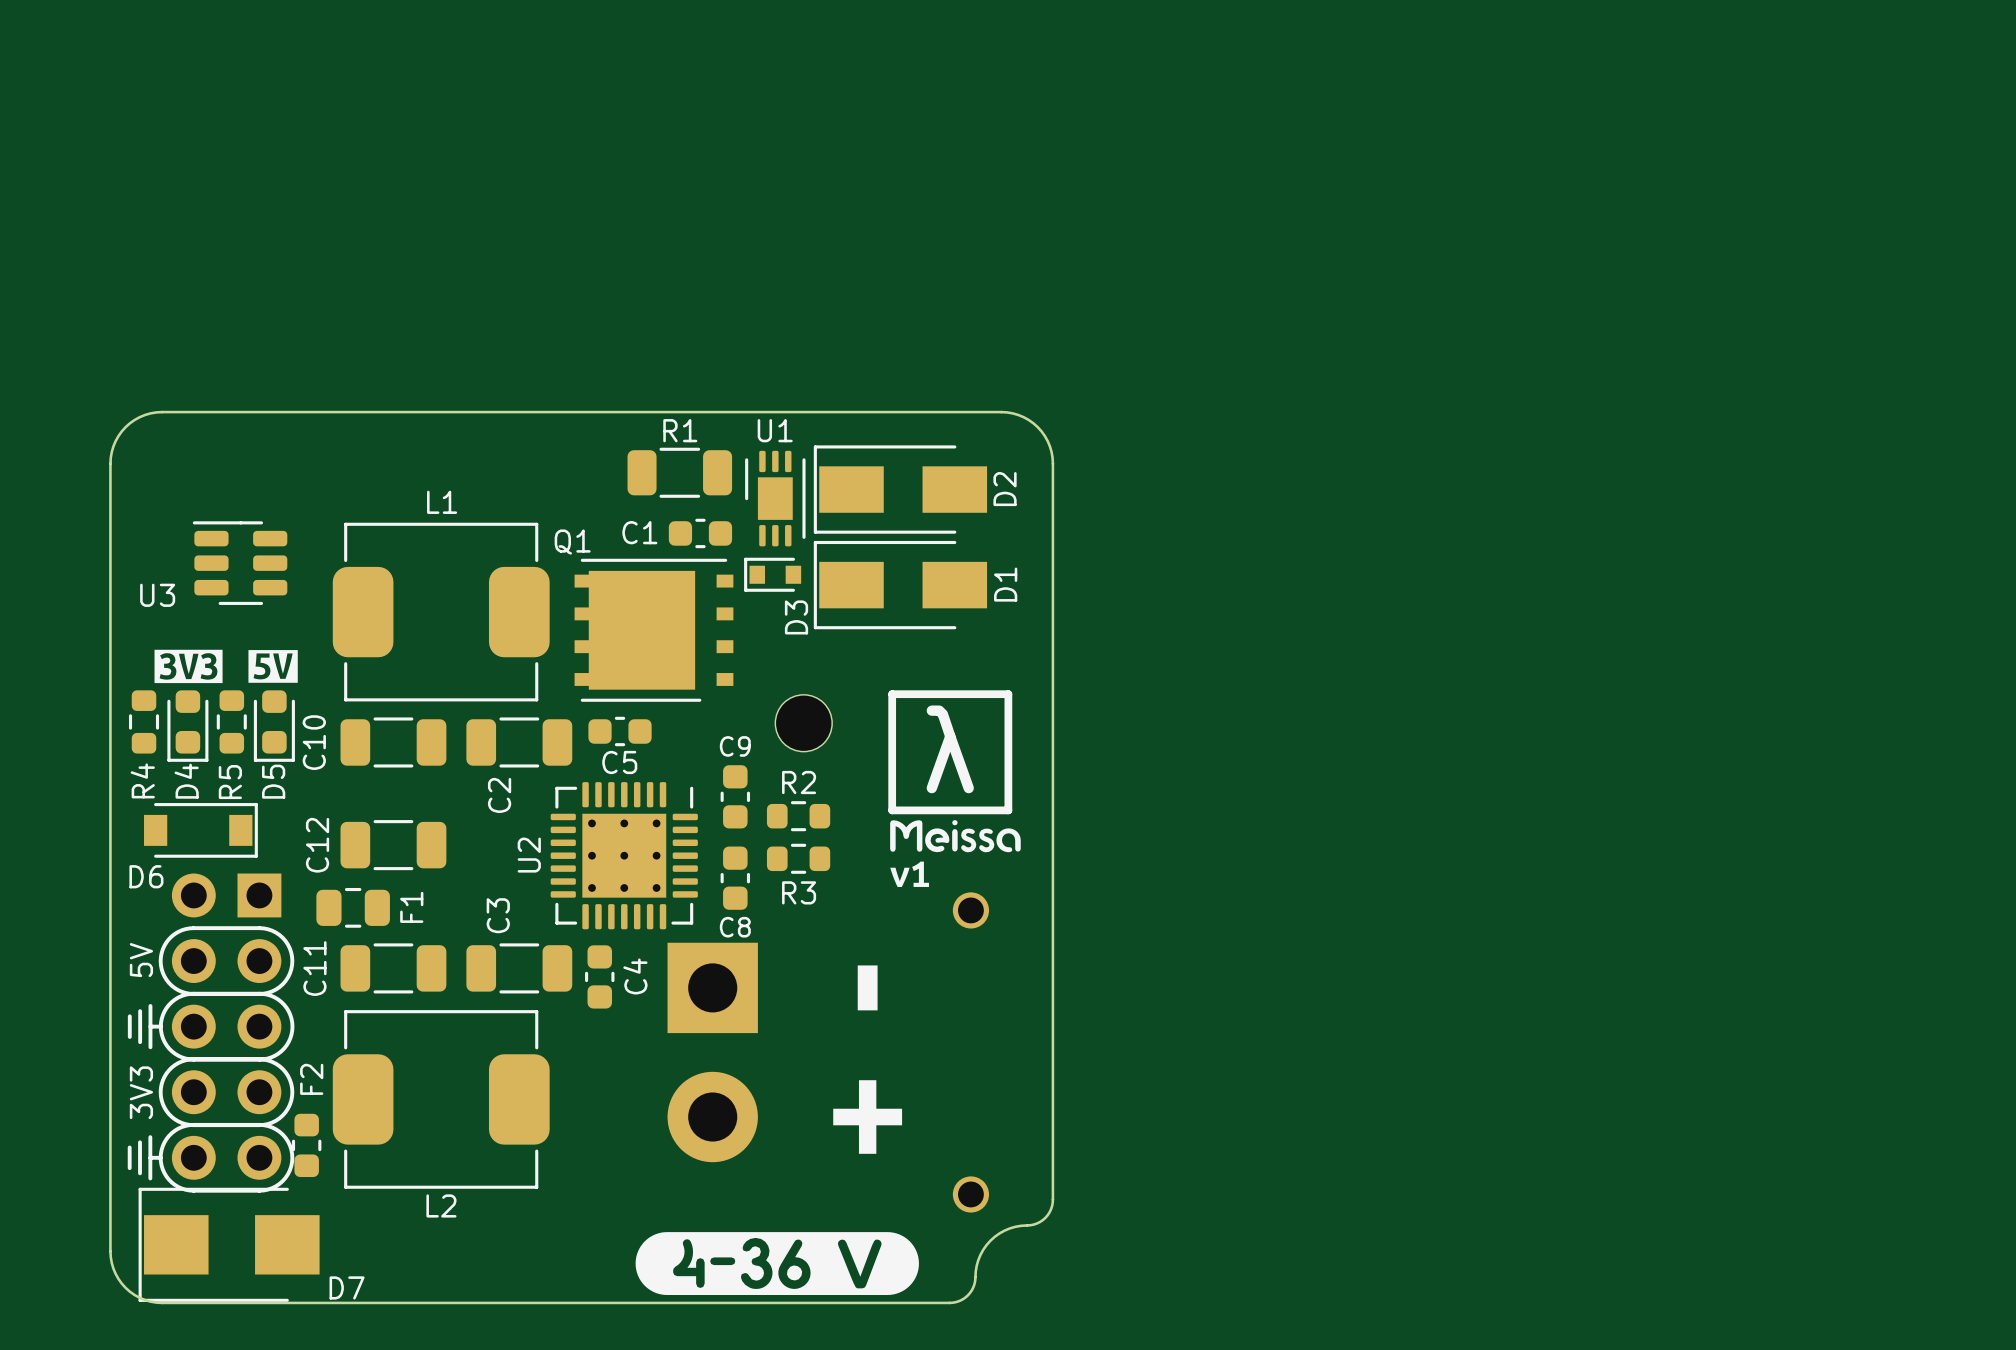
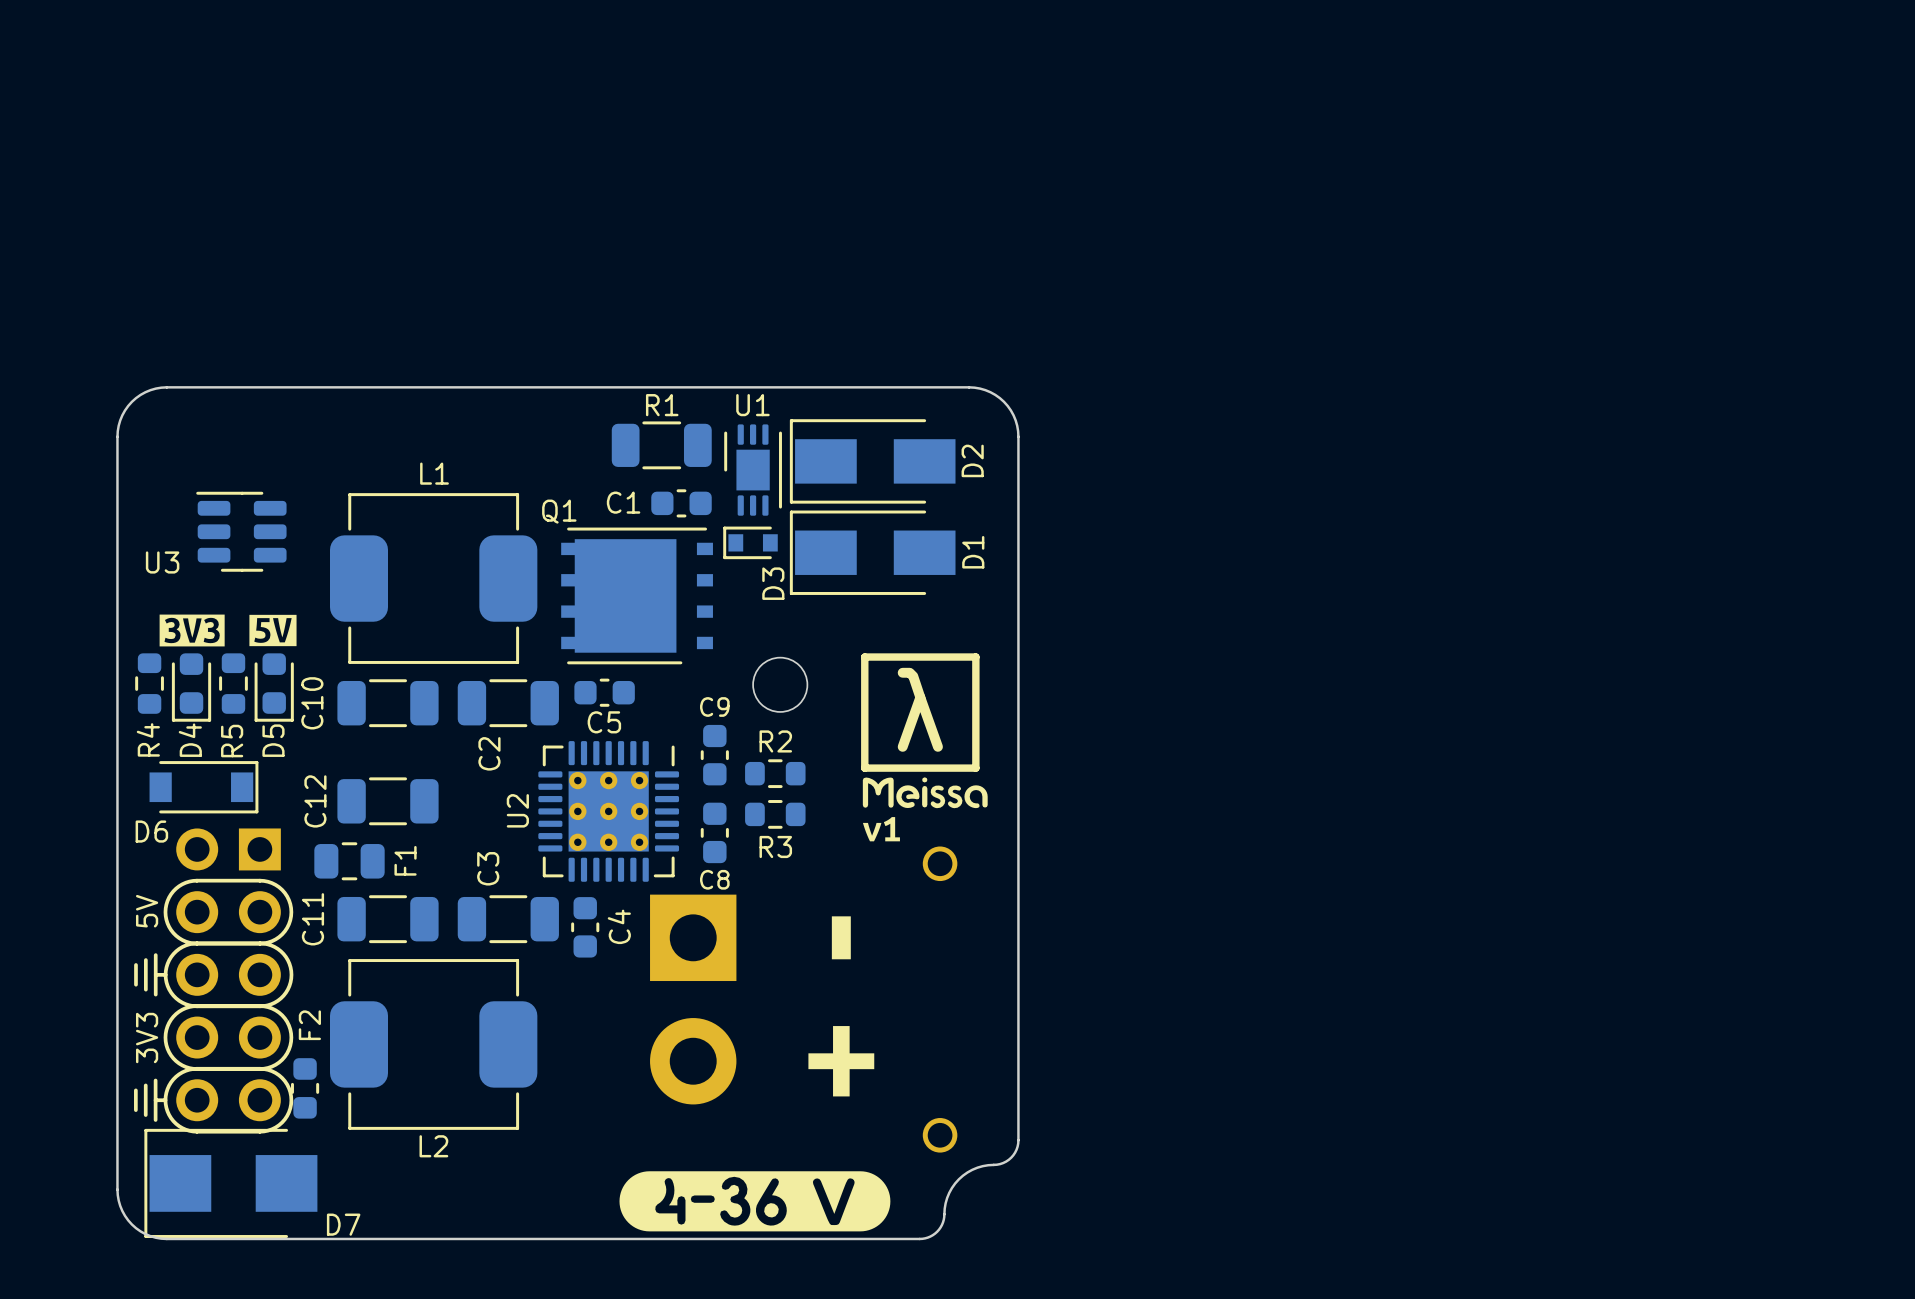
L1 footprint: [332, 522, 550, 702] -> [330, 493, 538, 664]
L2 footprint: [332, 1010, 550, 1189] -> [330, 959, 538, 1130]

